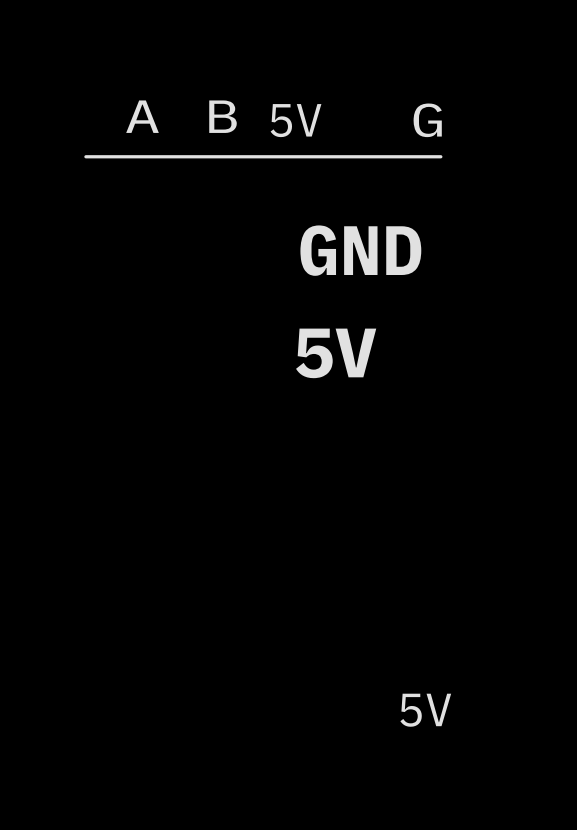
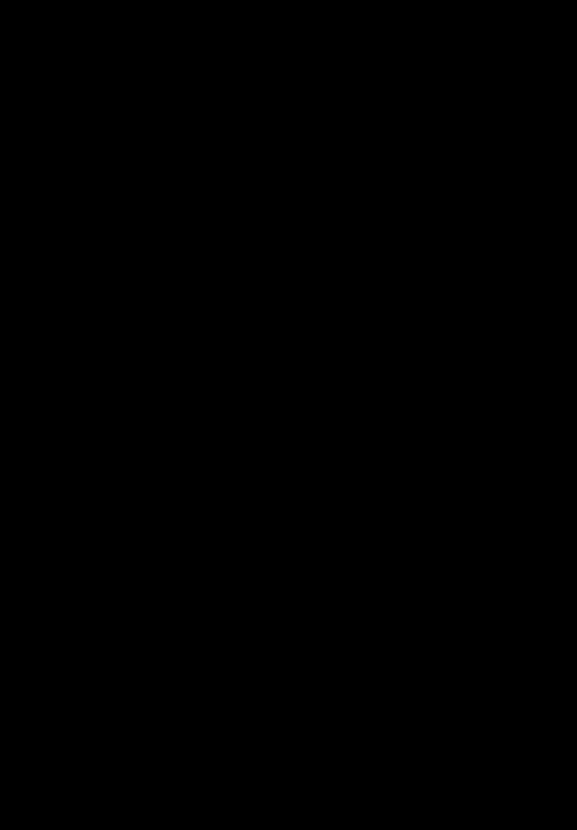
text: A (142, 116) -> none
text: B (223, 116) -> none
text: 5V (296, 120) -> none
text: G (427, 120) -> none
line: (85, 156) (440, 156) -> none
text: GND (360, 250) -> none
text: 5V (336, 353) -> none
text: 5V (425, 710) -> none

